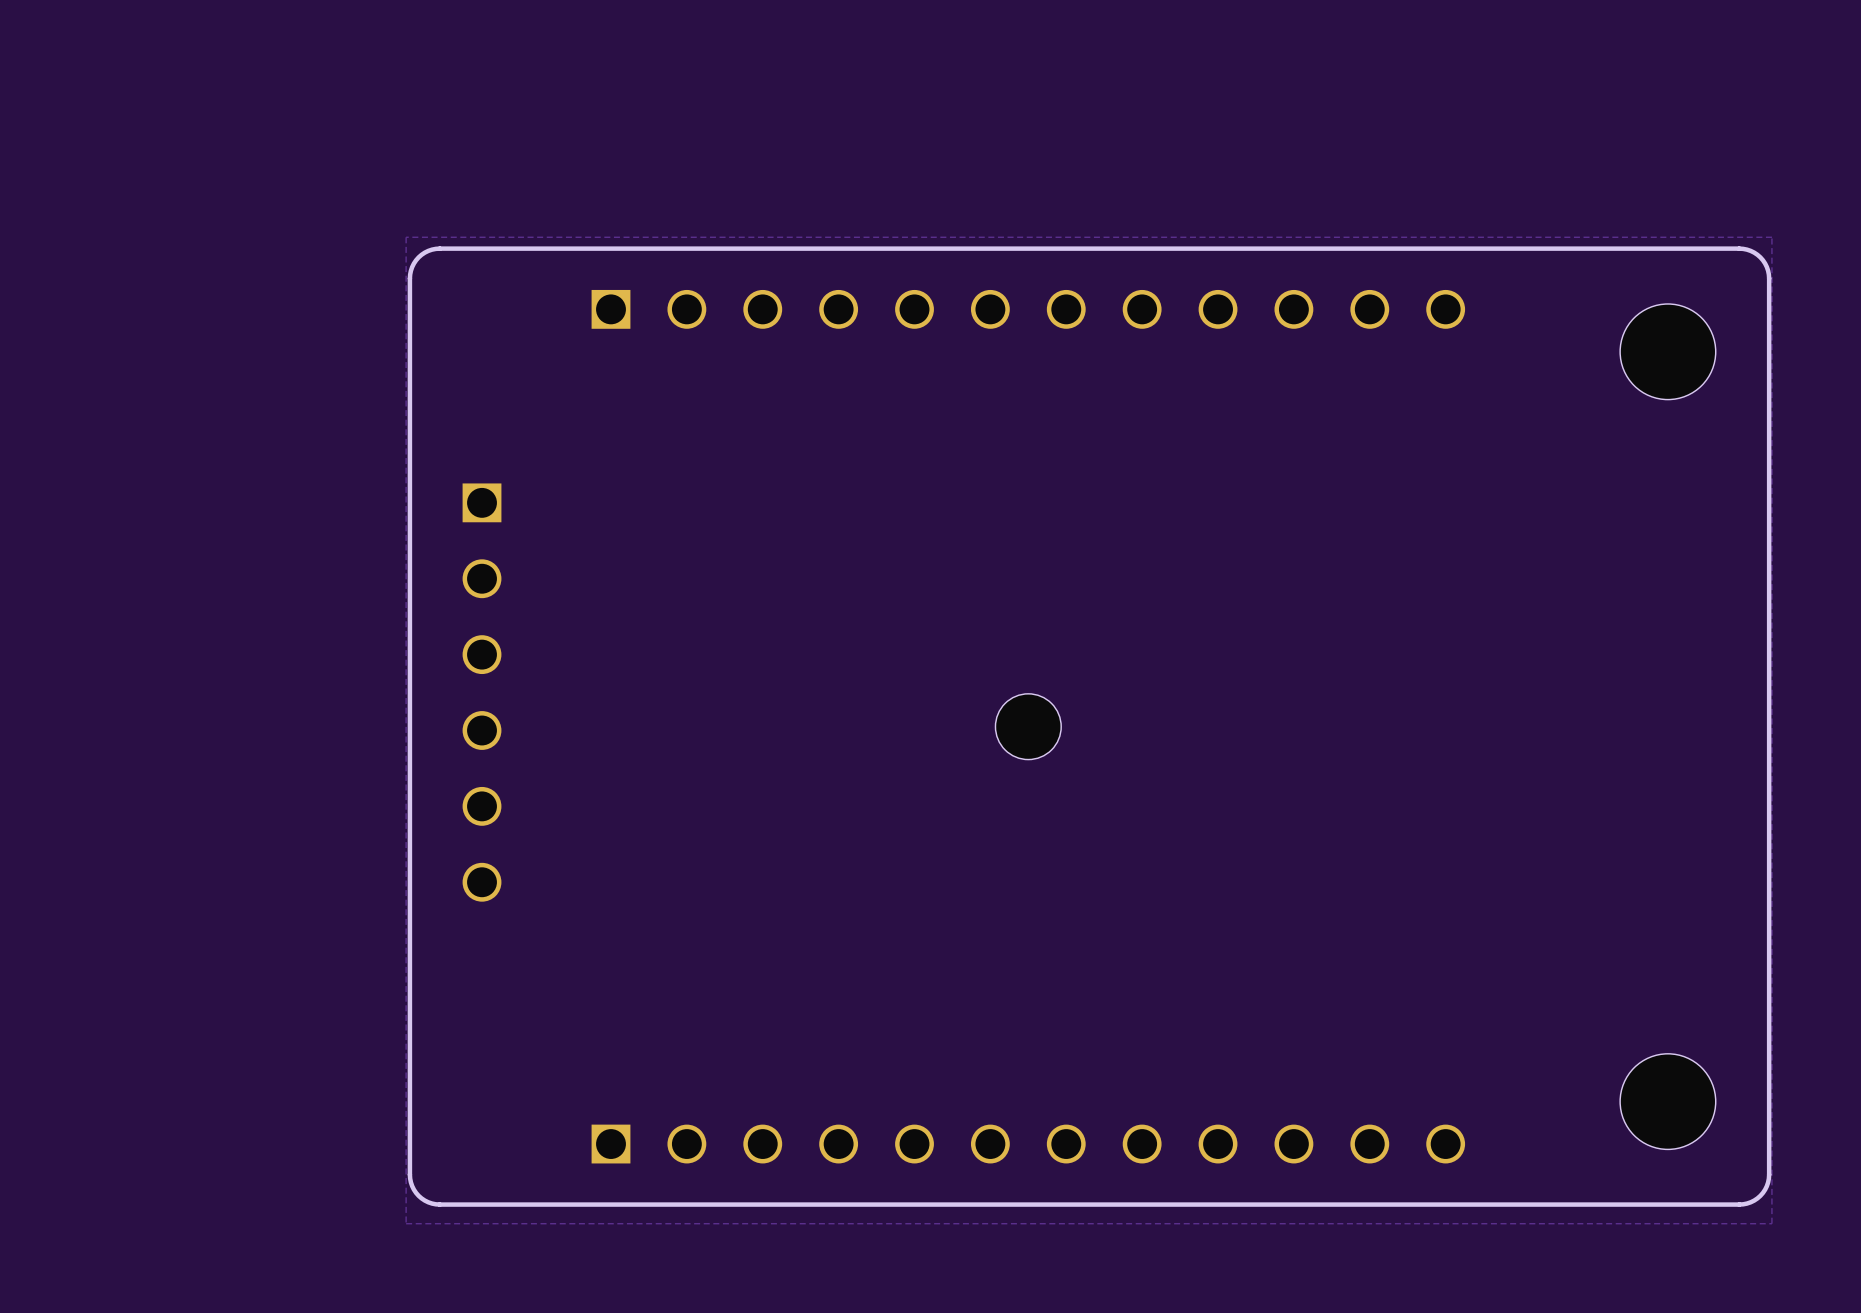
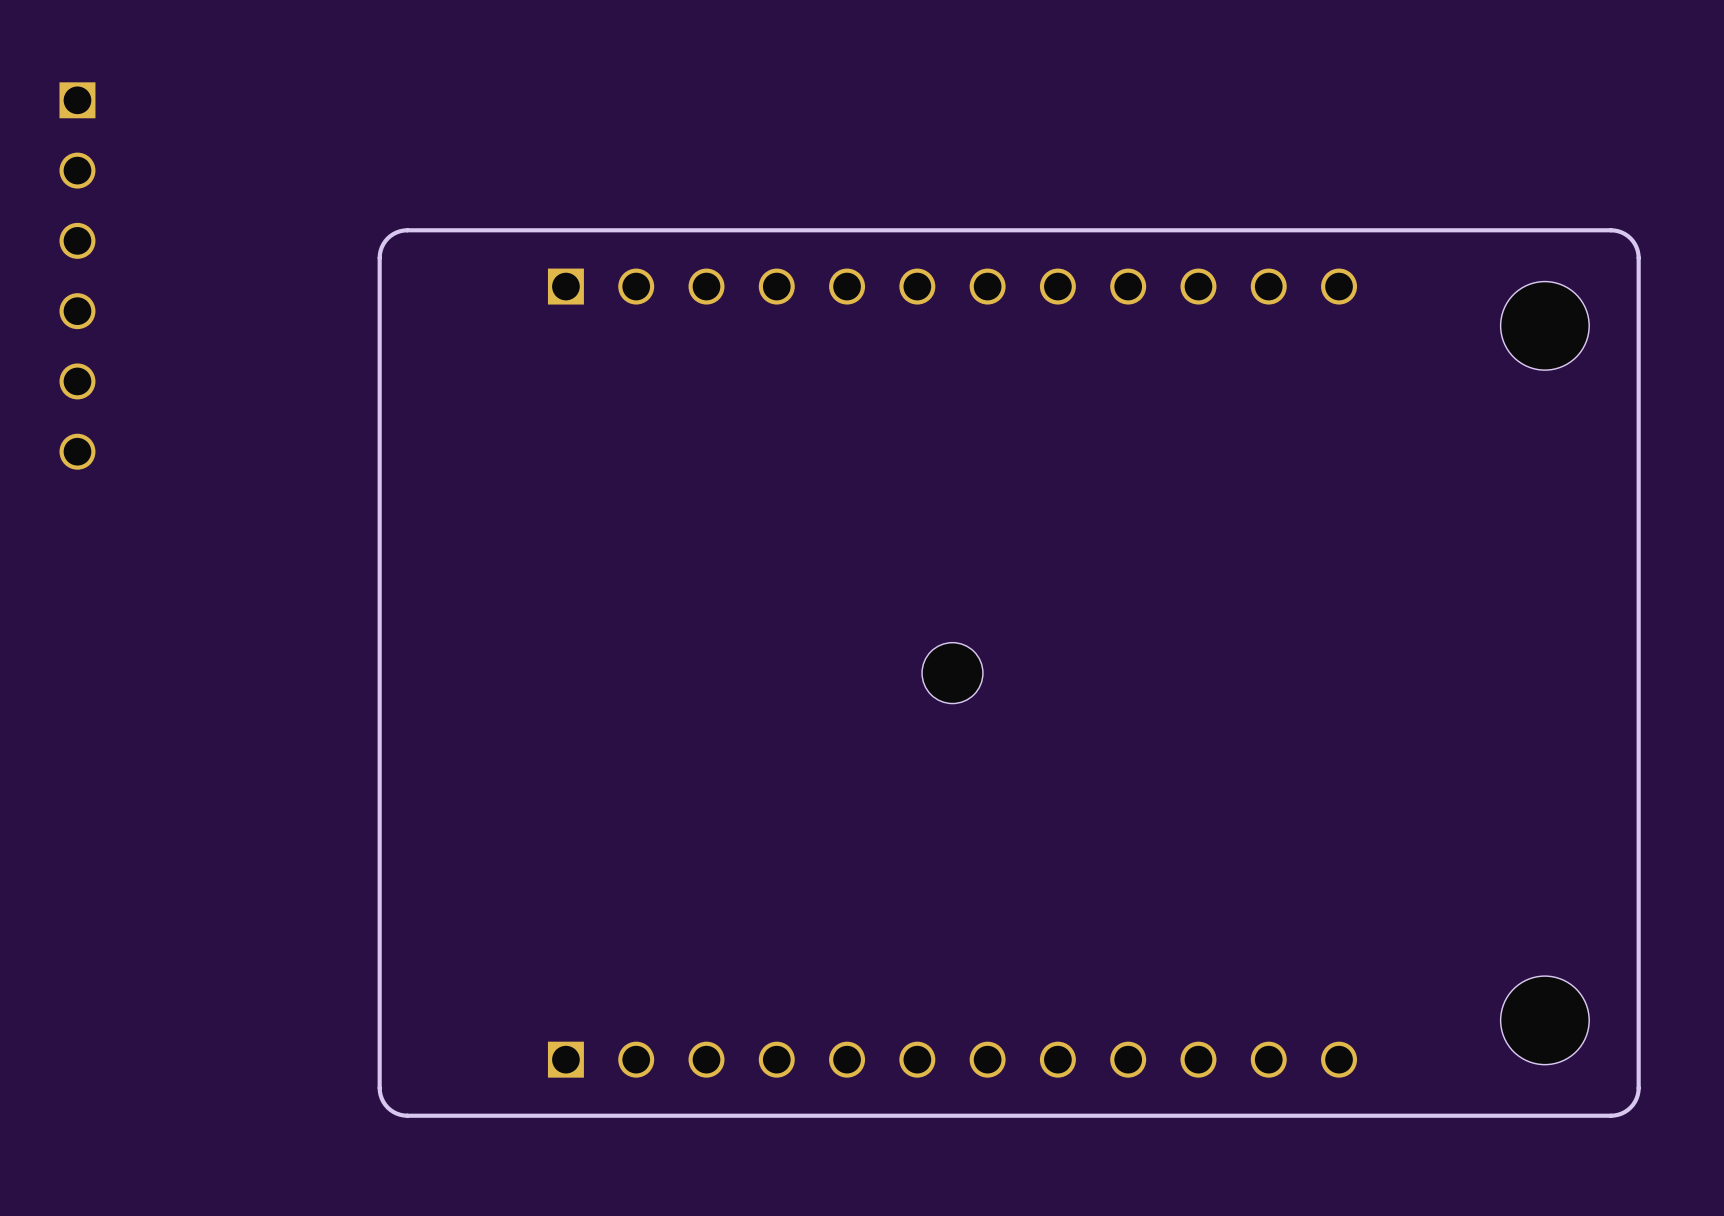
zone outline: (1771, 237) (406, 237) (406, 1223) (1771, 1223) (1771, 237) -> none
part position: (482, 692) -> (77, 276)

